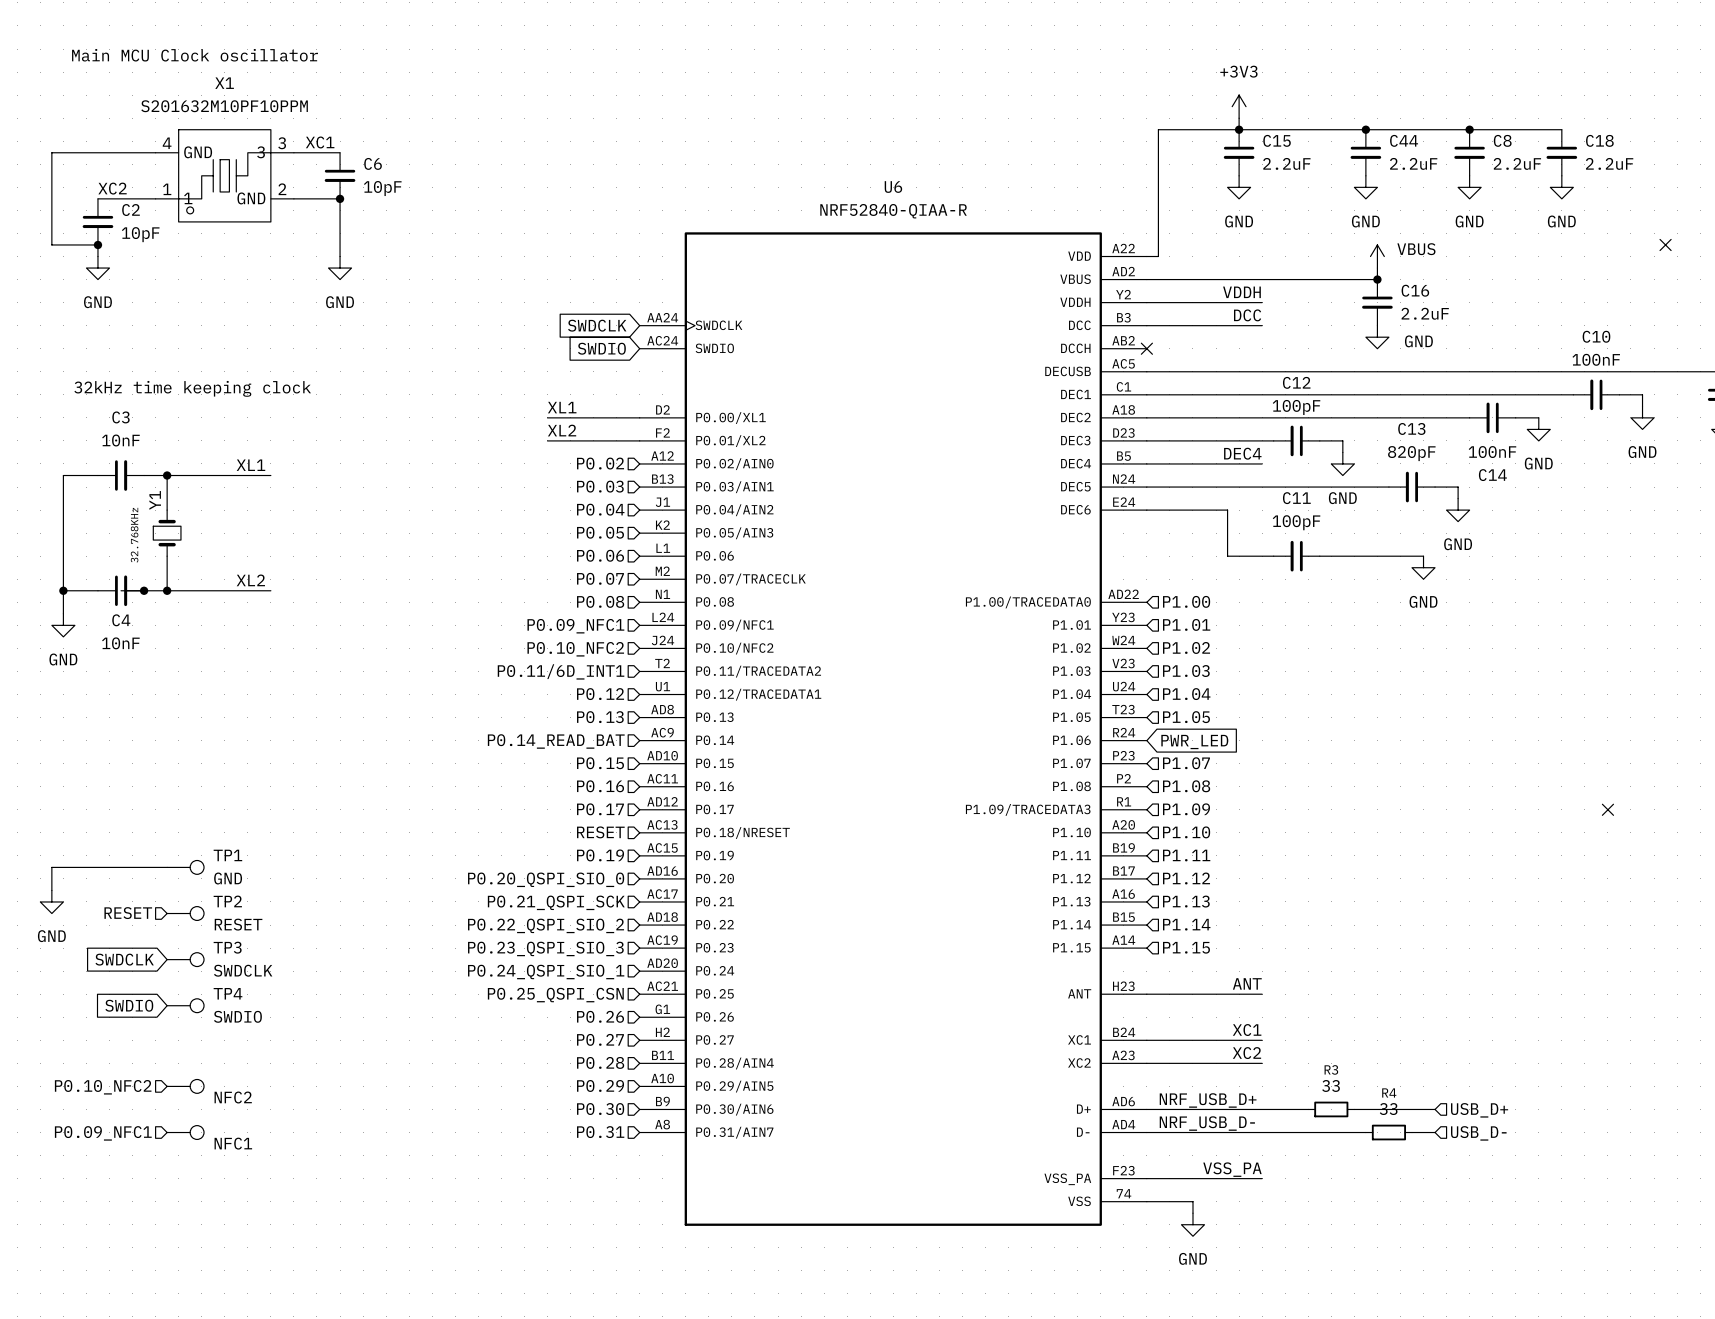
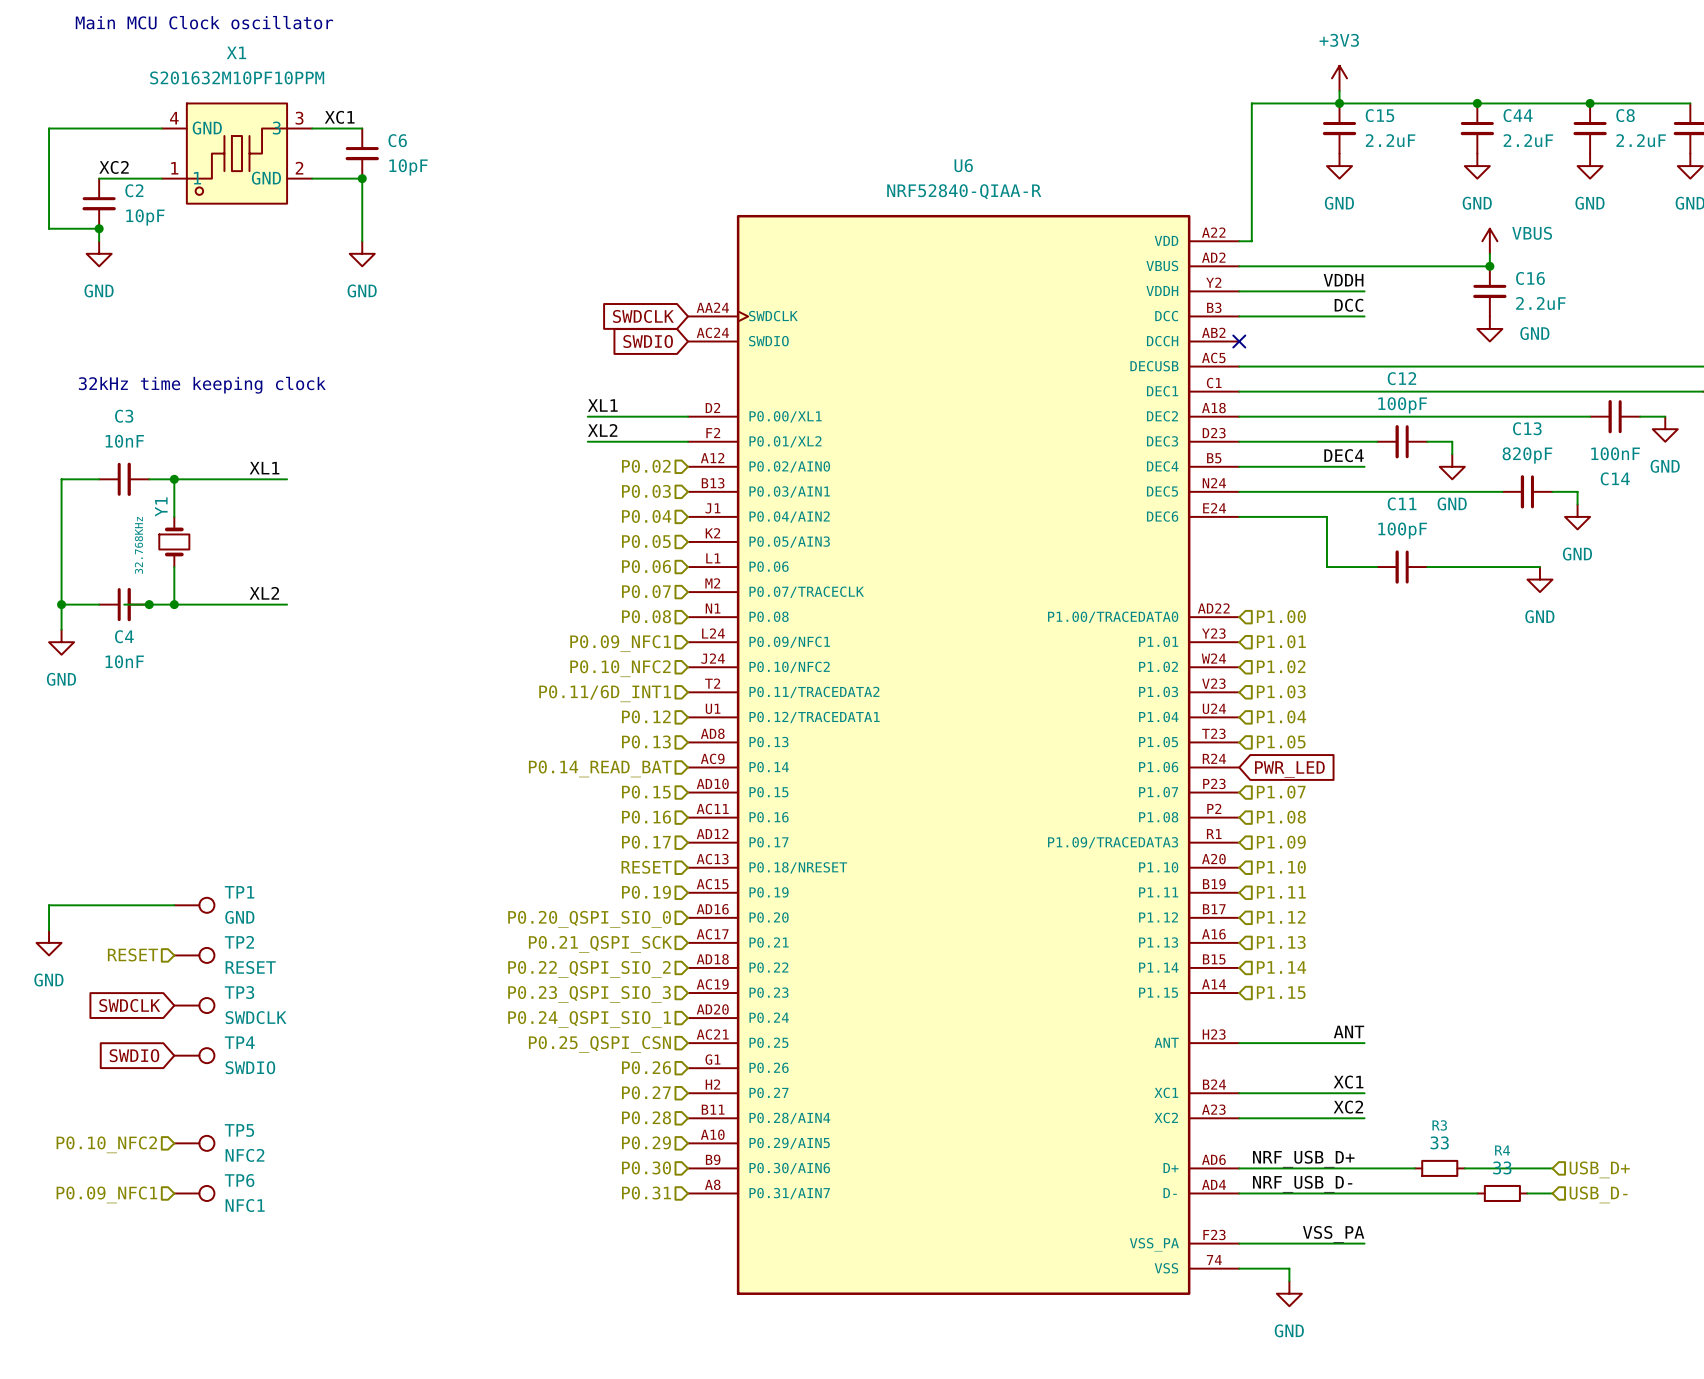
TP5 name: none -> TP5 (239, 1130)
TP6 name: none -> TP6 (239, 1180)

